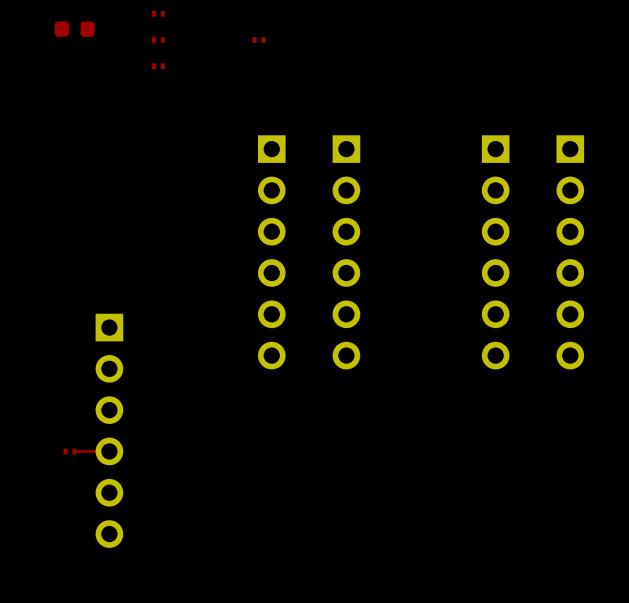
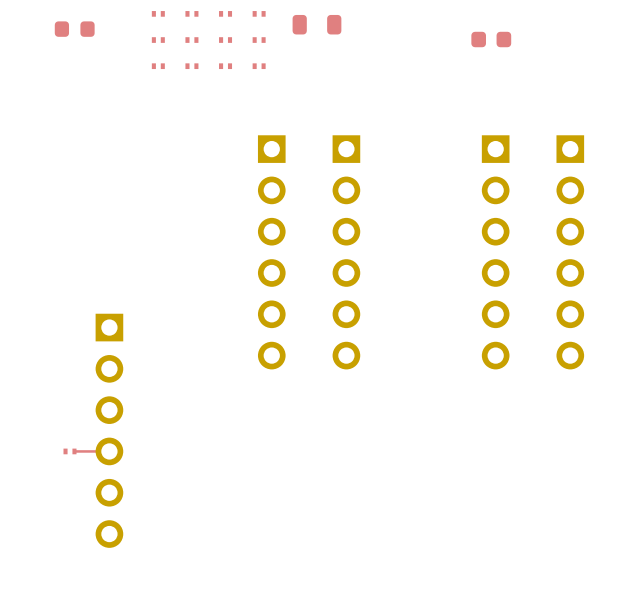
part: none -> (191, 13)
part: none -> (225, 13)
part: none -> (259, 13)
part: none -> (316, 24)
part: none -> (491, 39)
part: none -> (191, 40)
part: none -> (225, 40)
part: none -> (191, 66)
part: none -> (225, 66)
part: none -> (259, 66)

